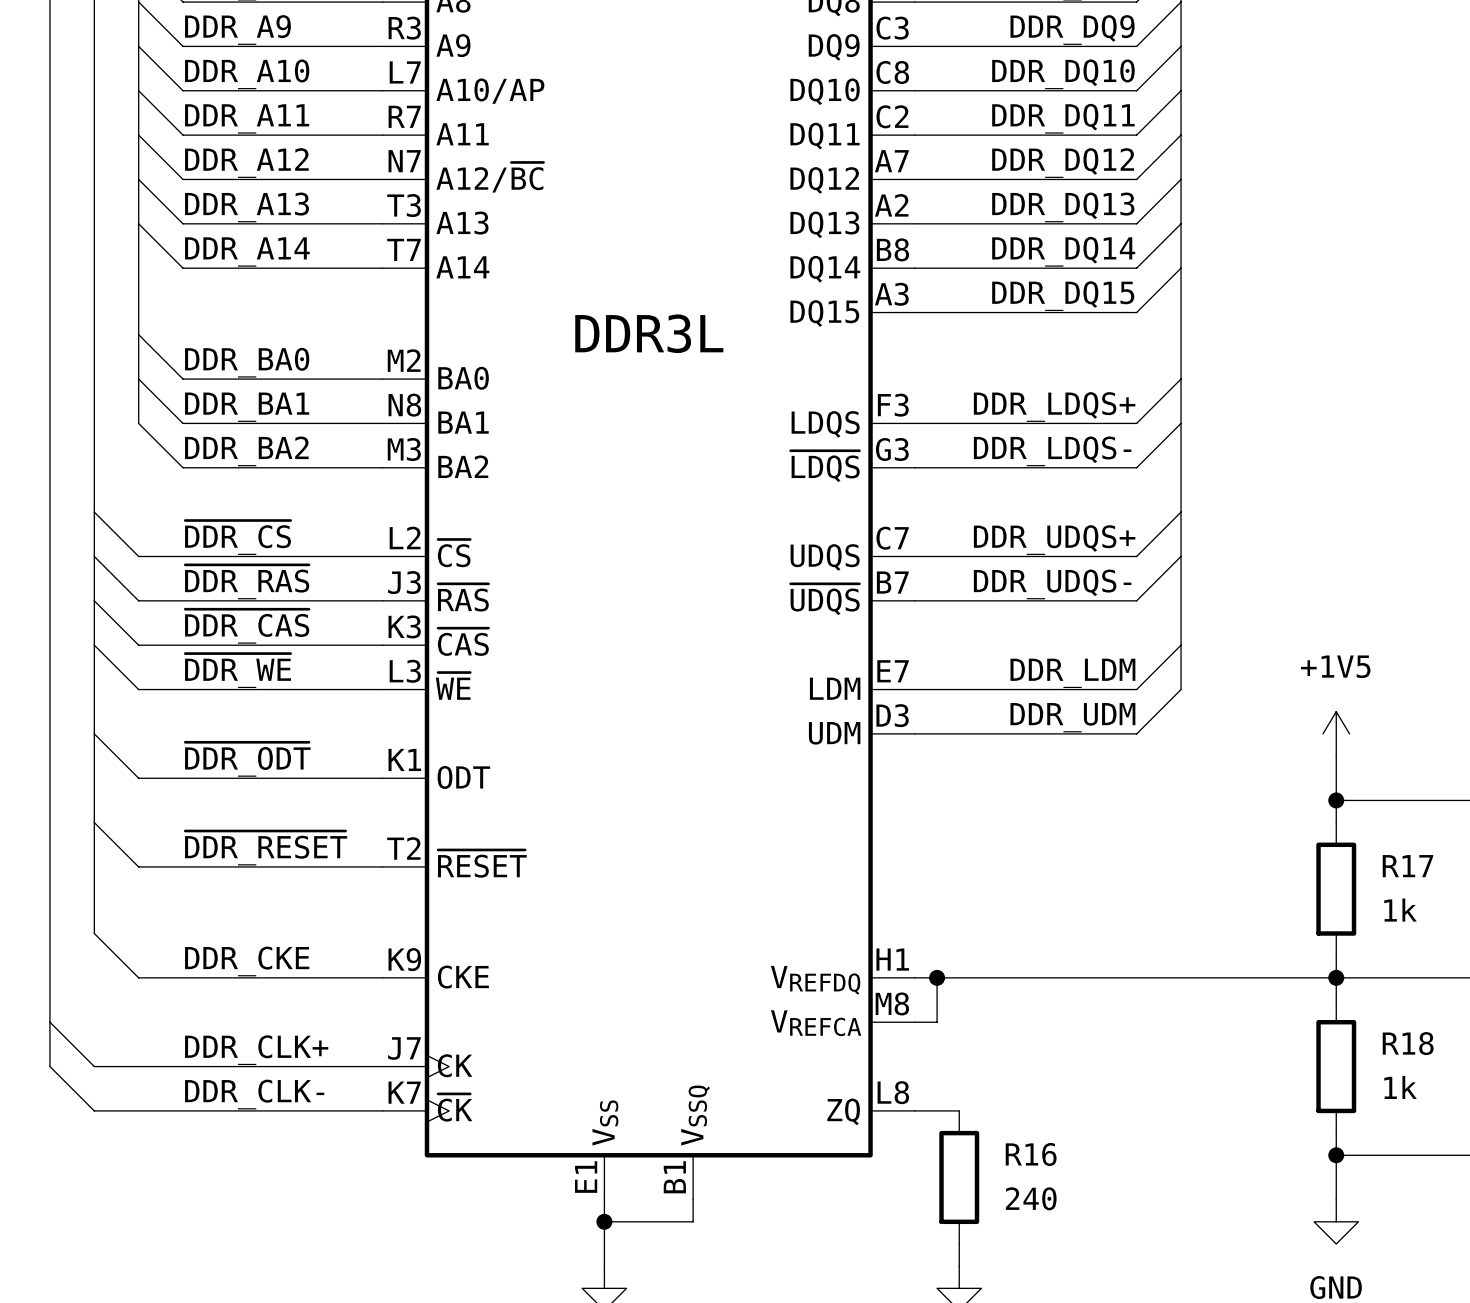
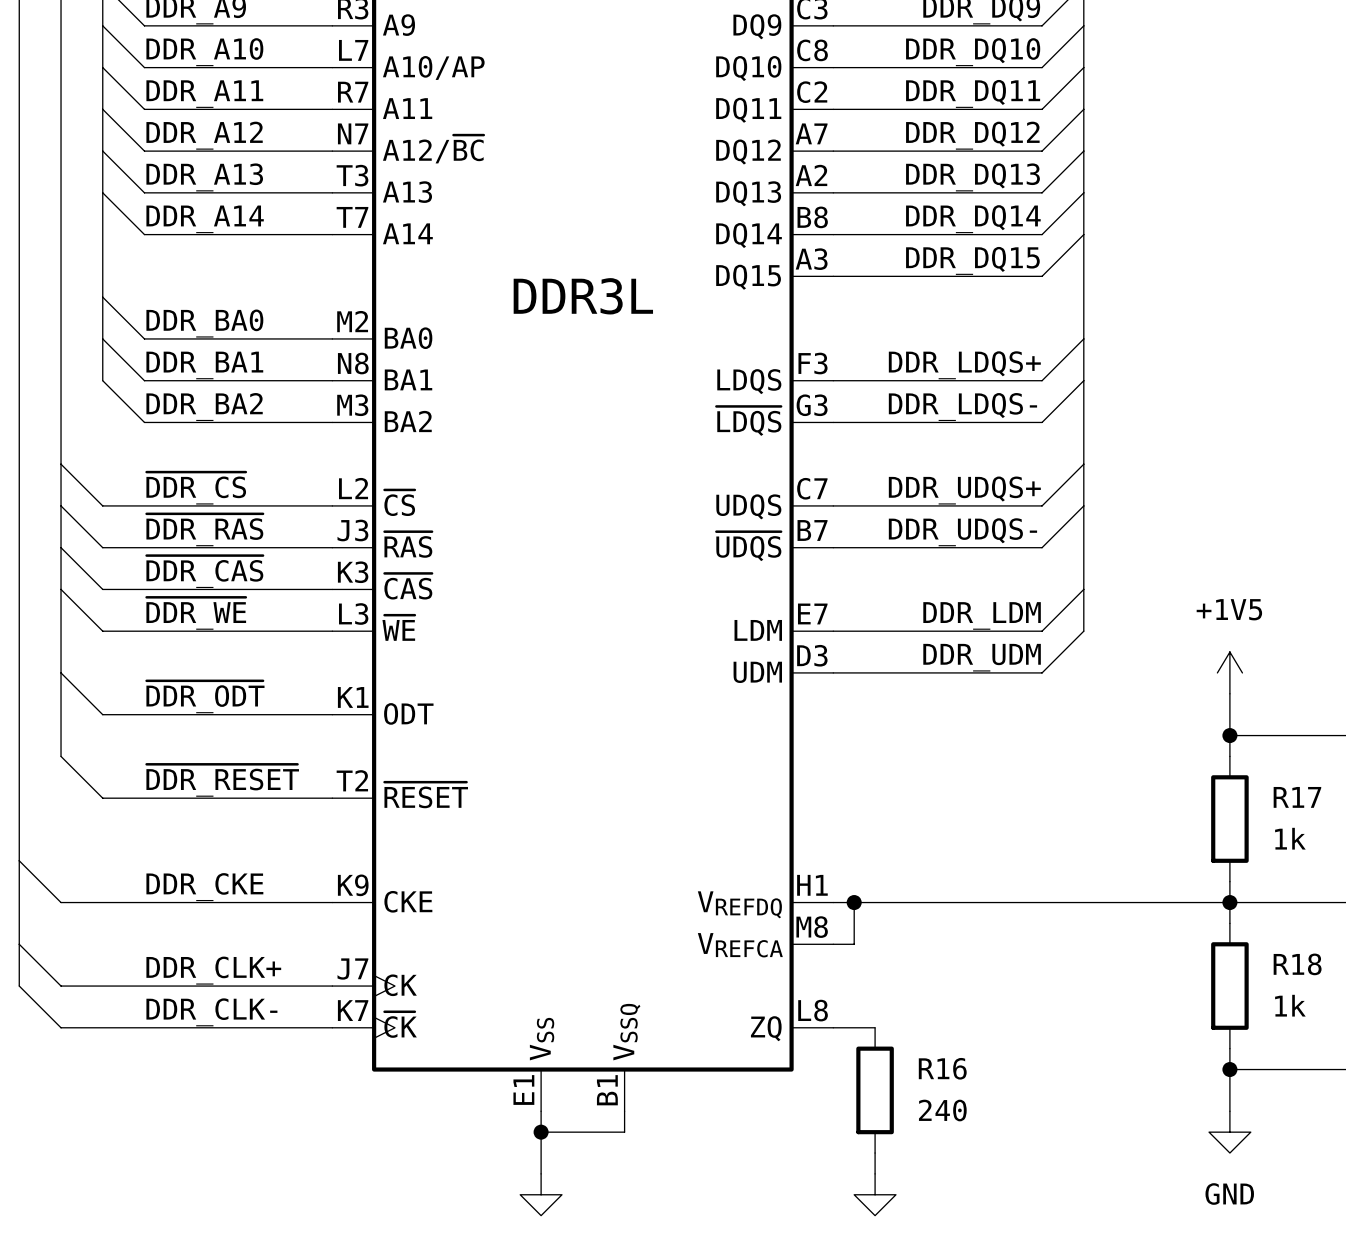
bus: (94, 822) (94, 933) -> none
wire: (94, 933) (138, 977) -> (19, 860) (61, 902) (102, 902)

